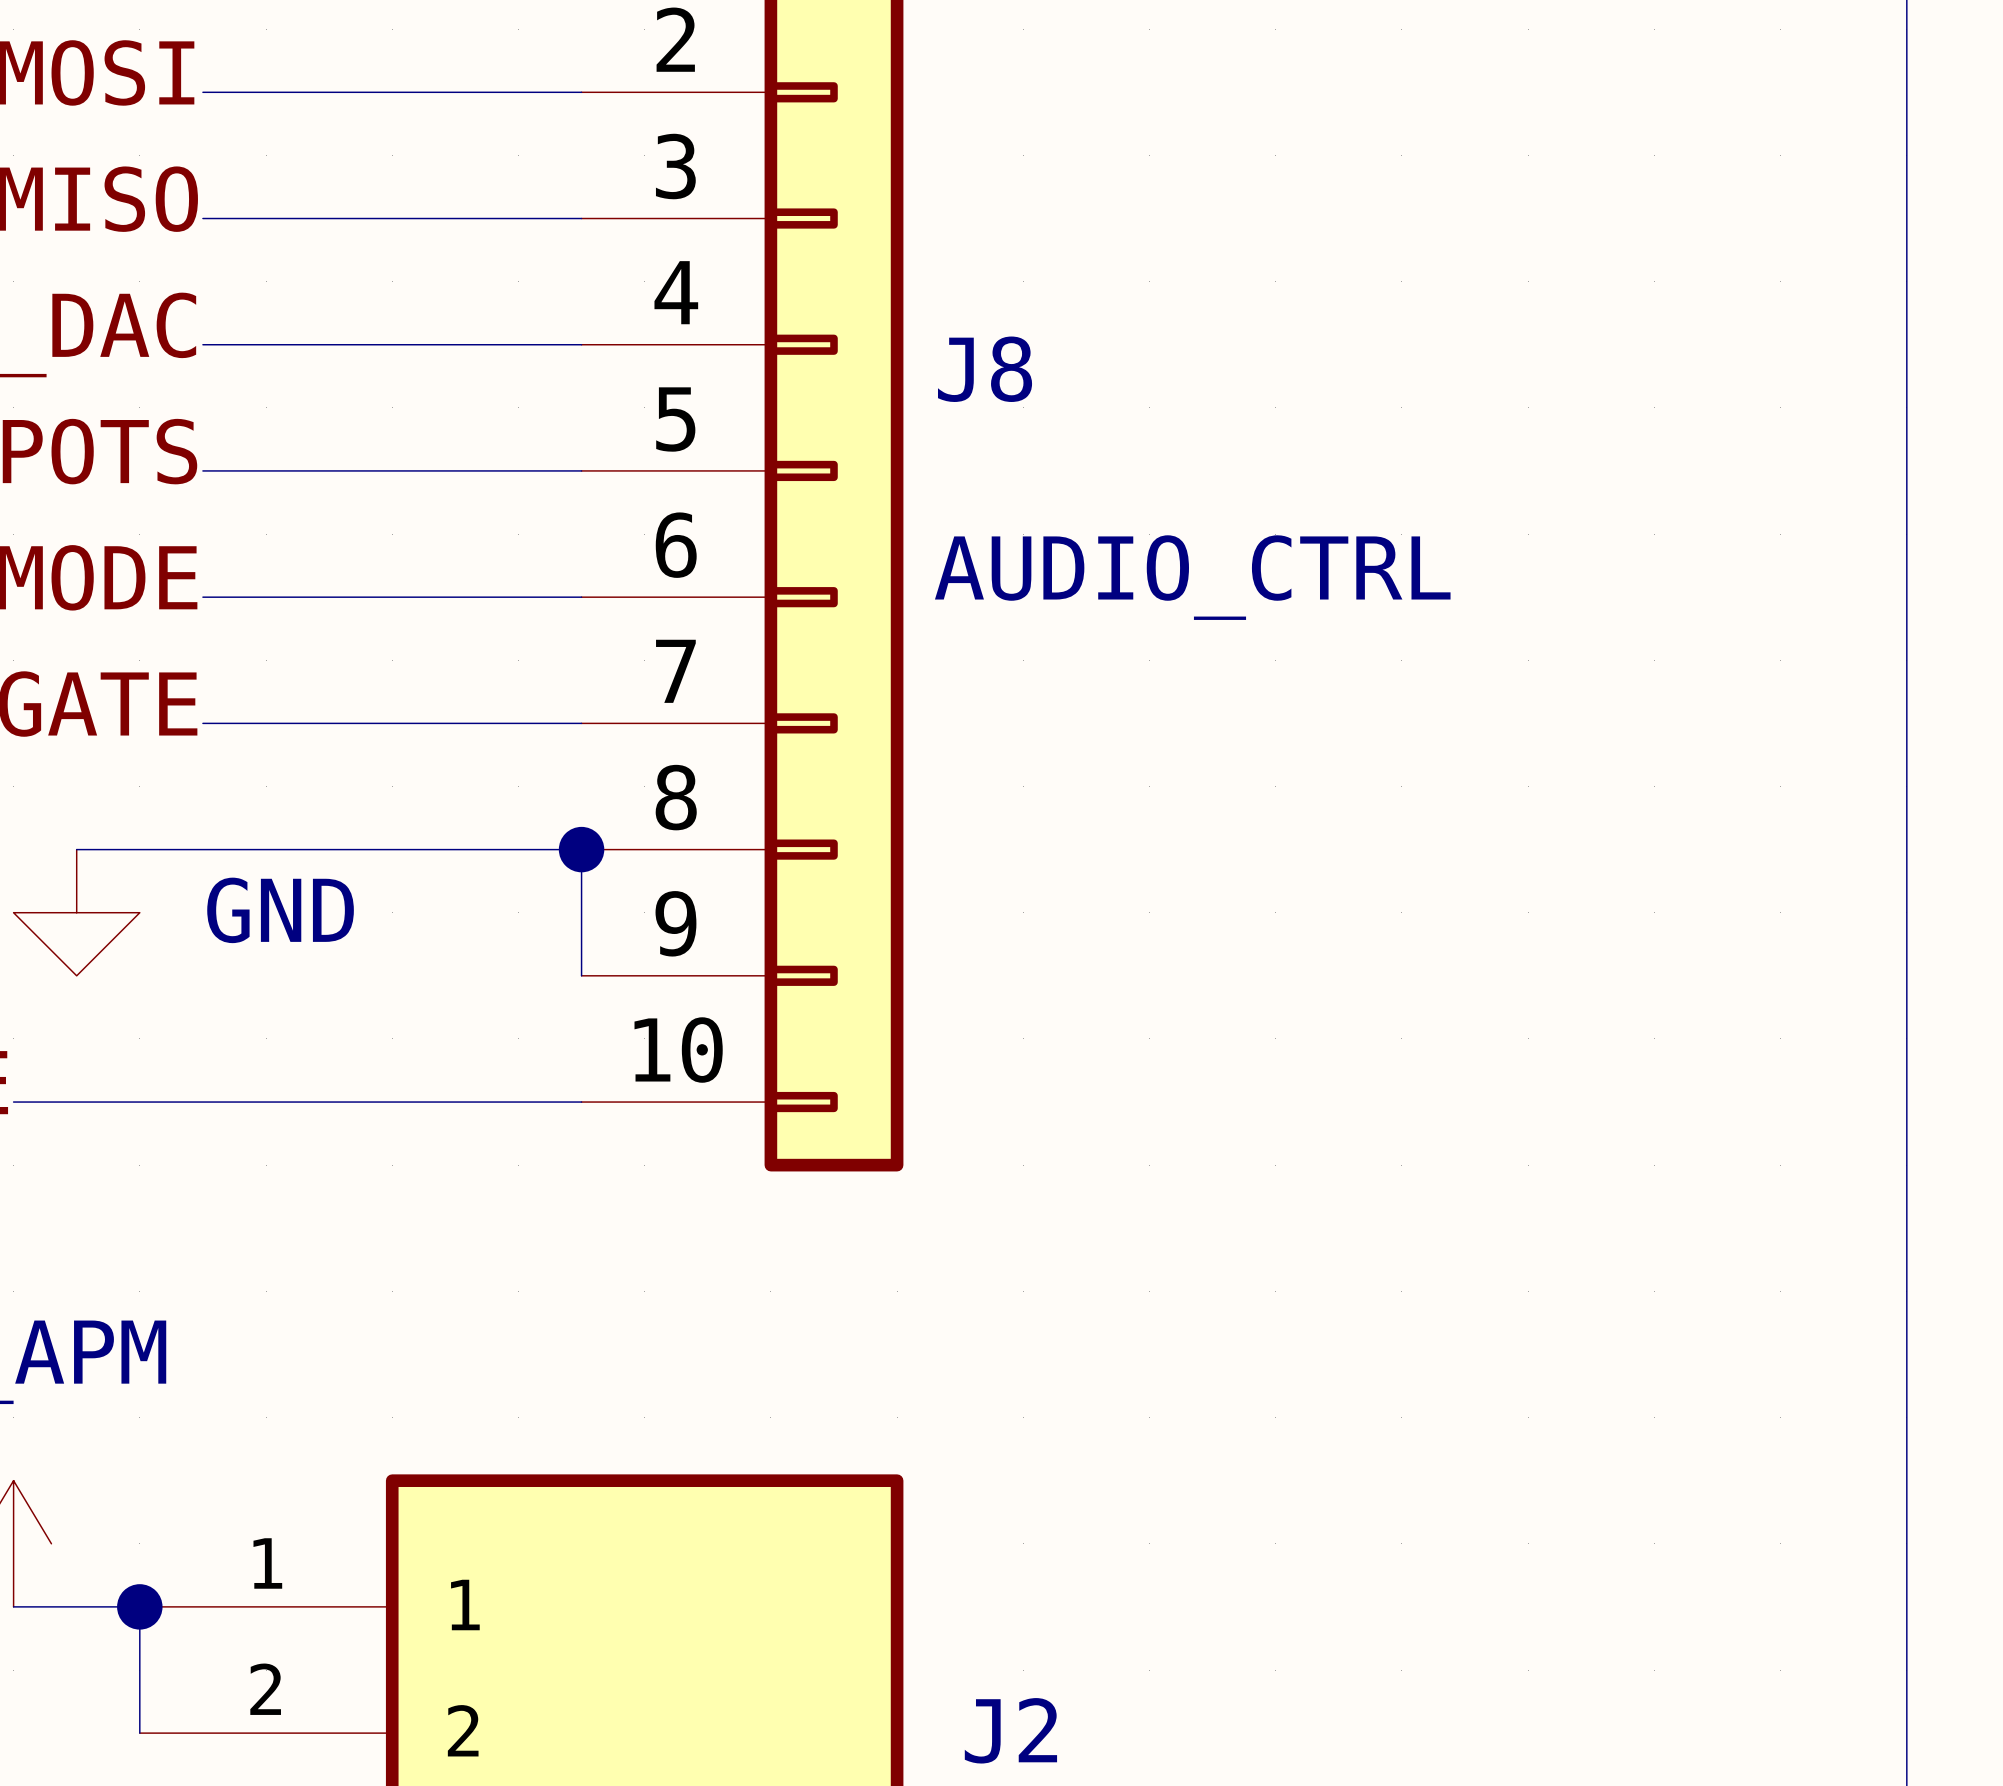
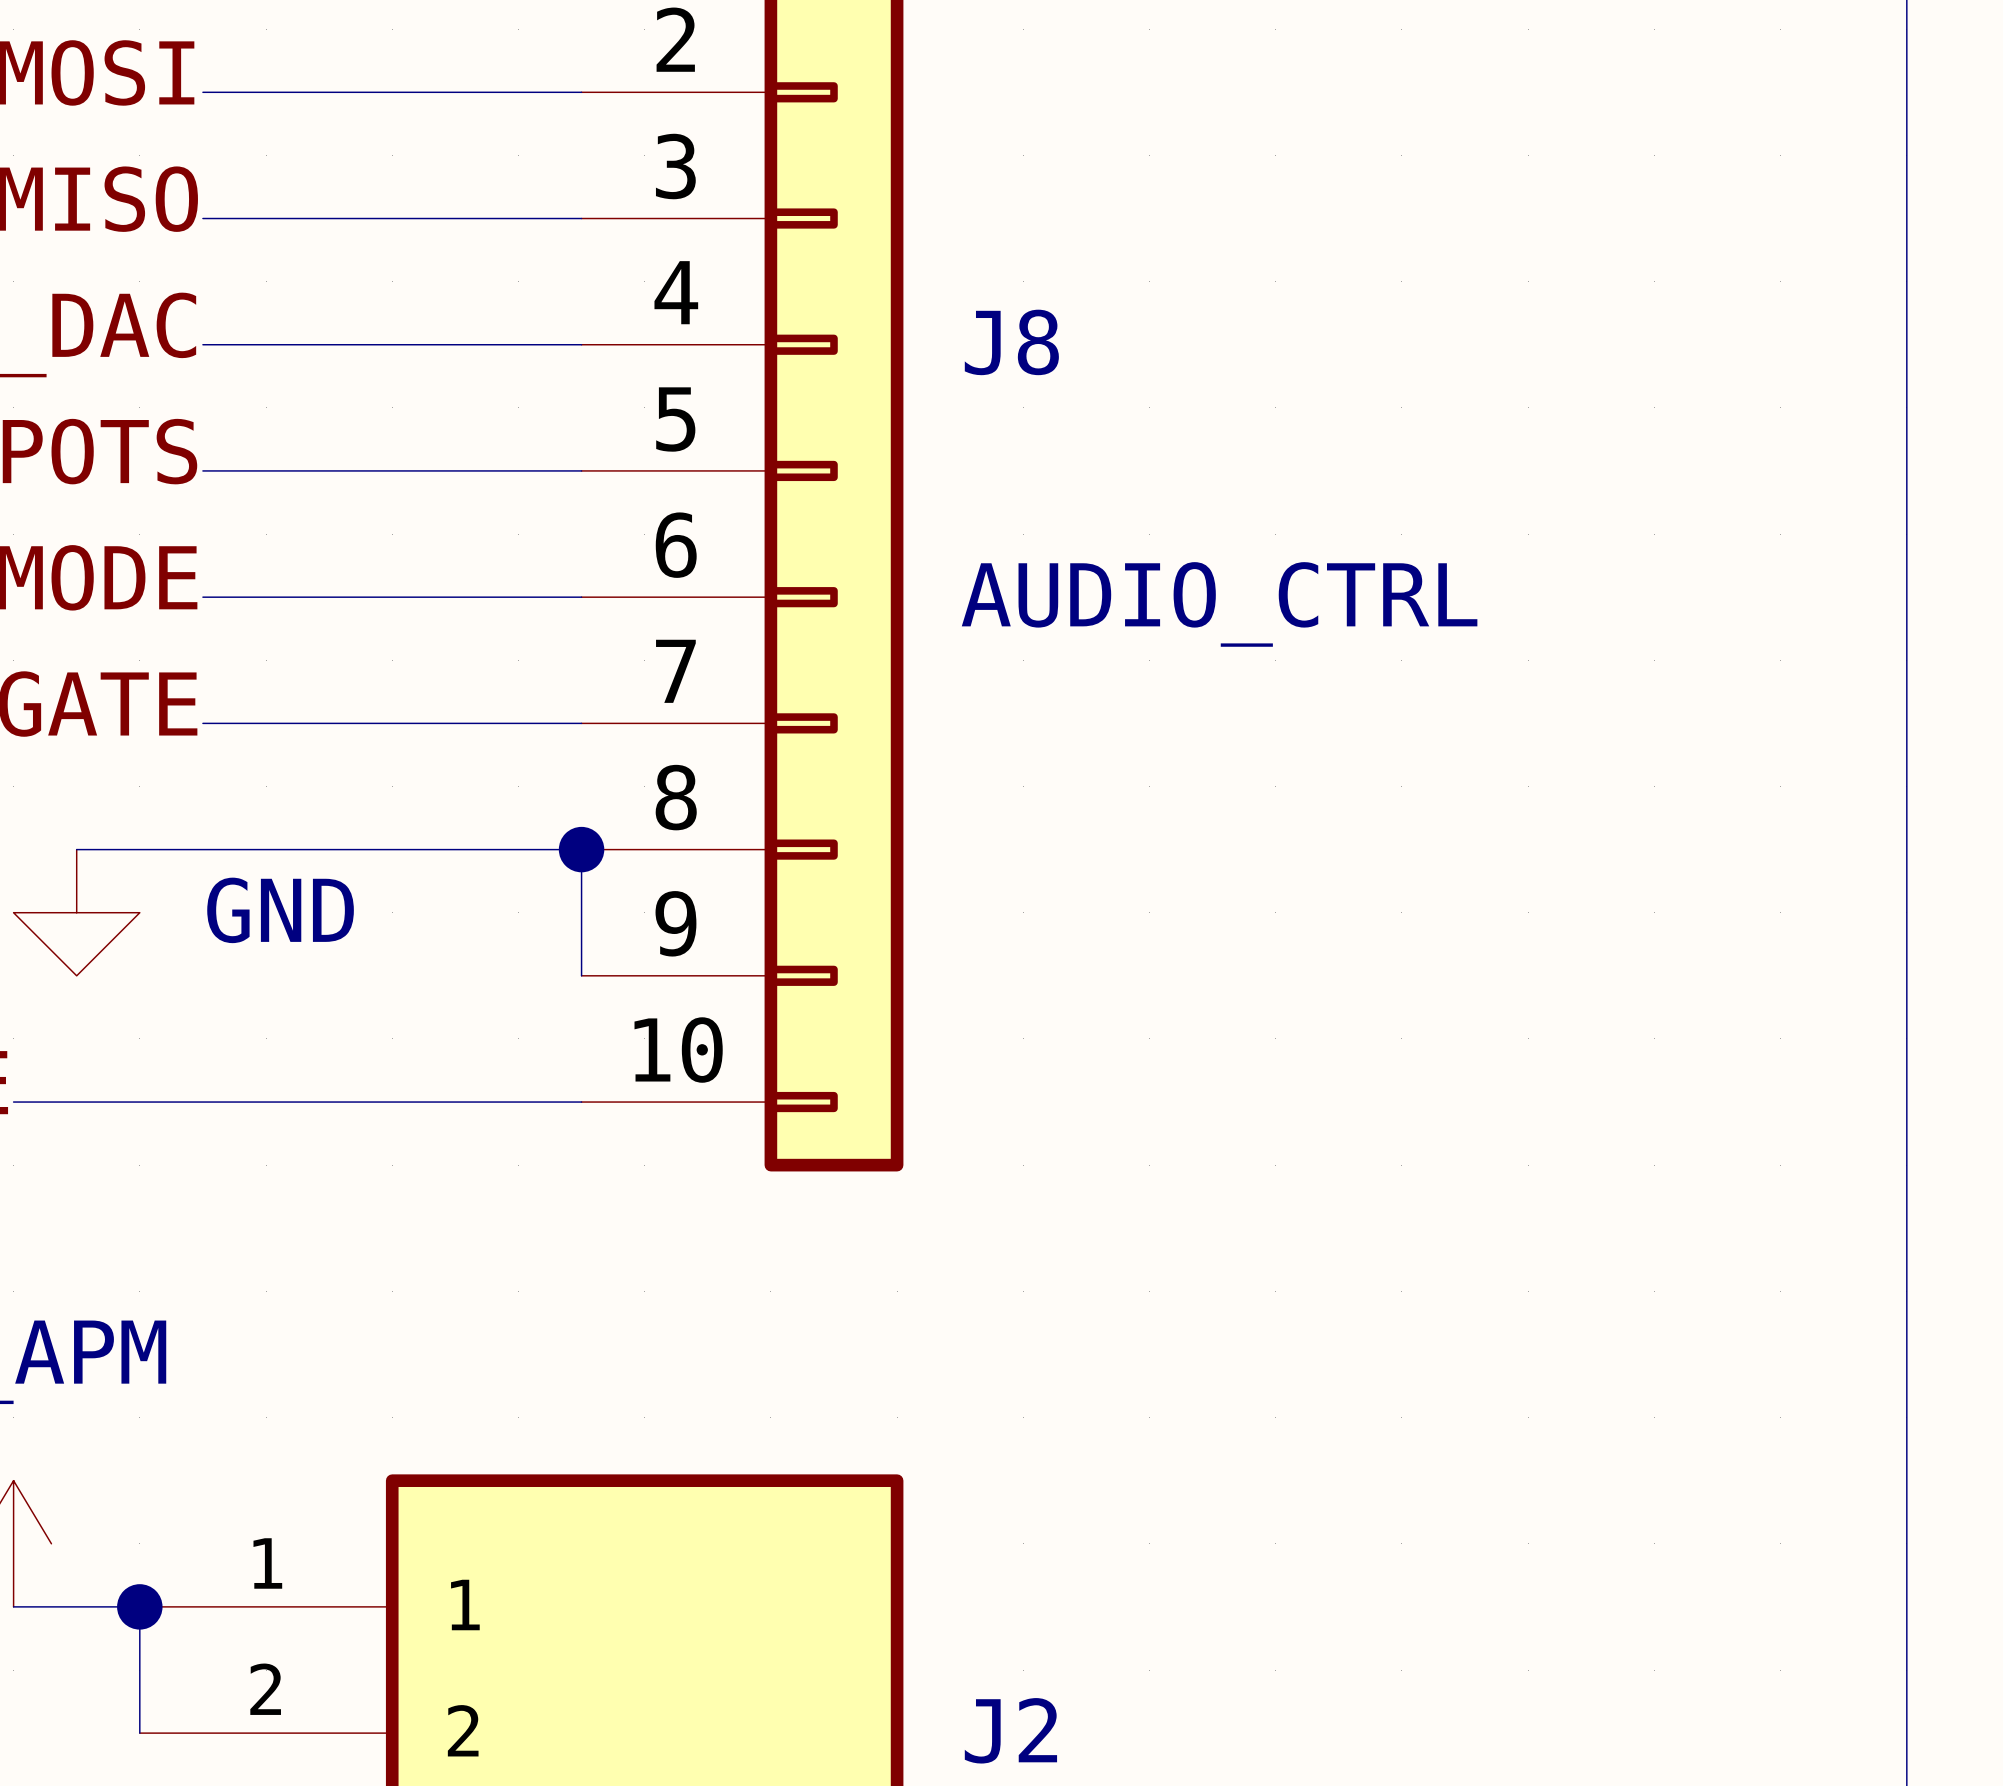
J8 name position: J8 (985, 369) -> J8 (1011, 342)
J8 value position: AUDIO_CTRL (1192, 577) -> AUDIO_CTRL (1219, 604)

